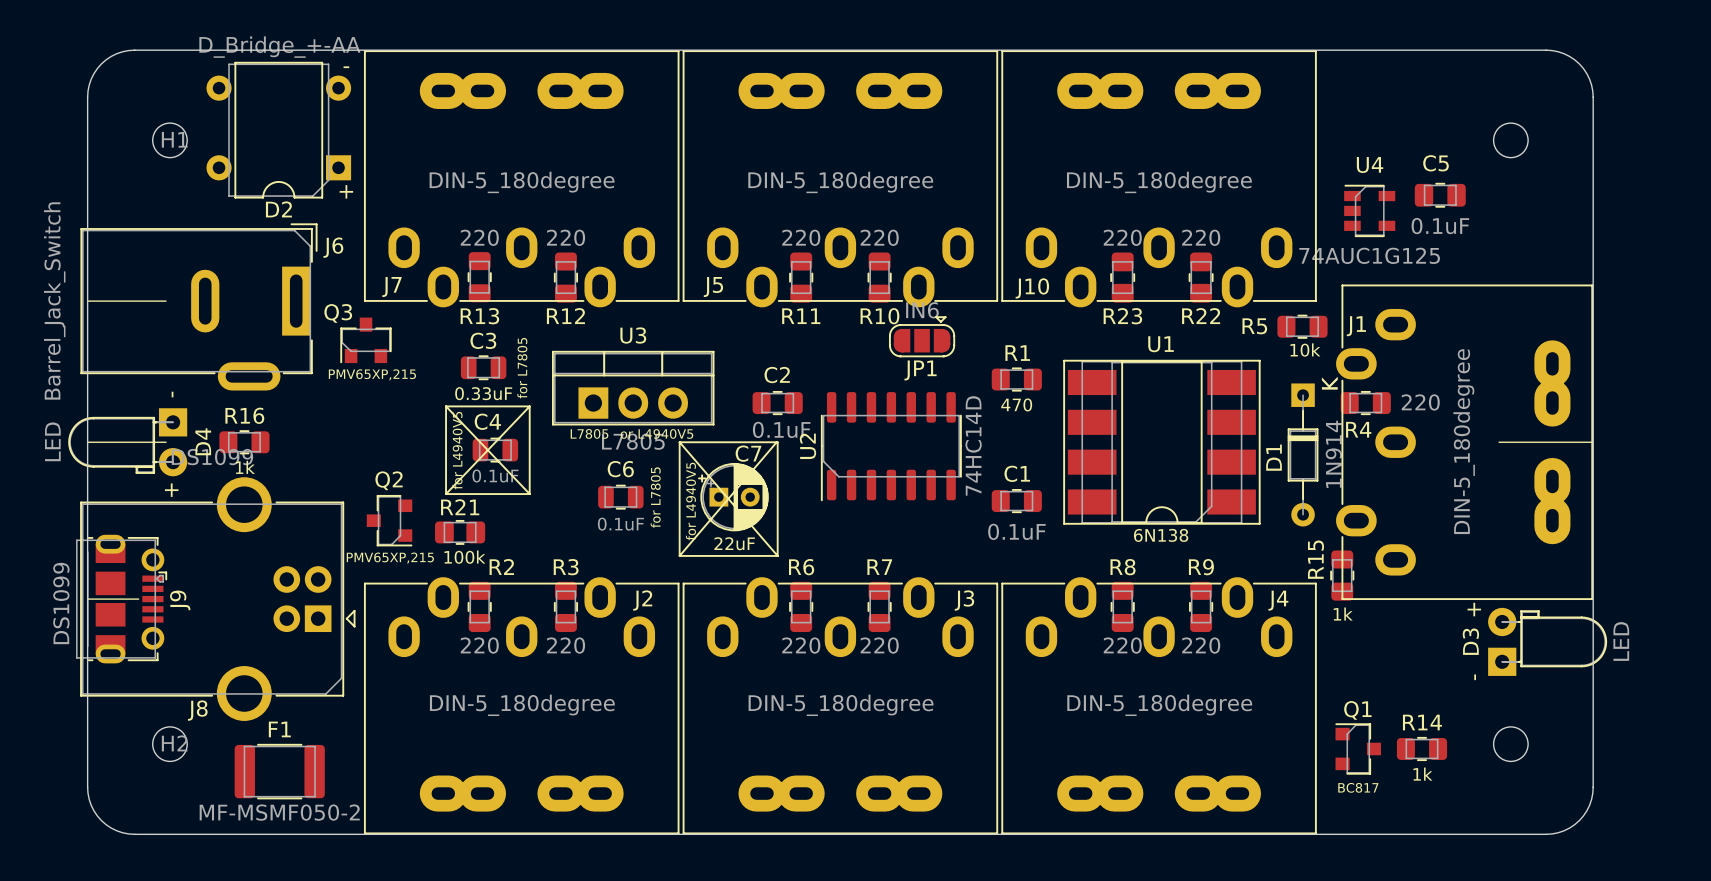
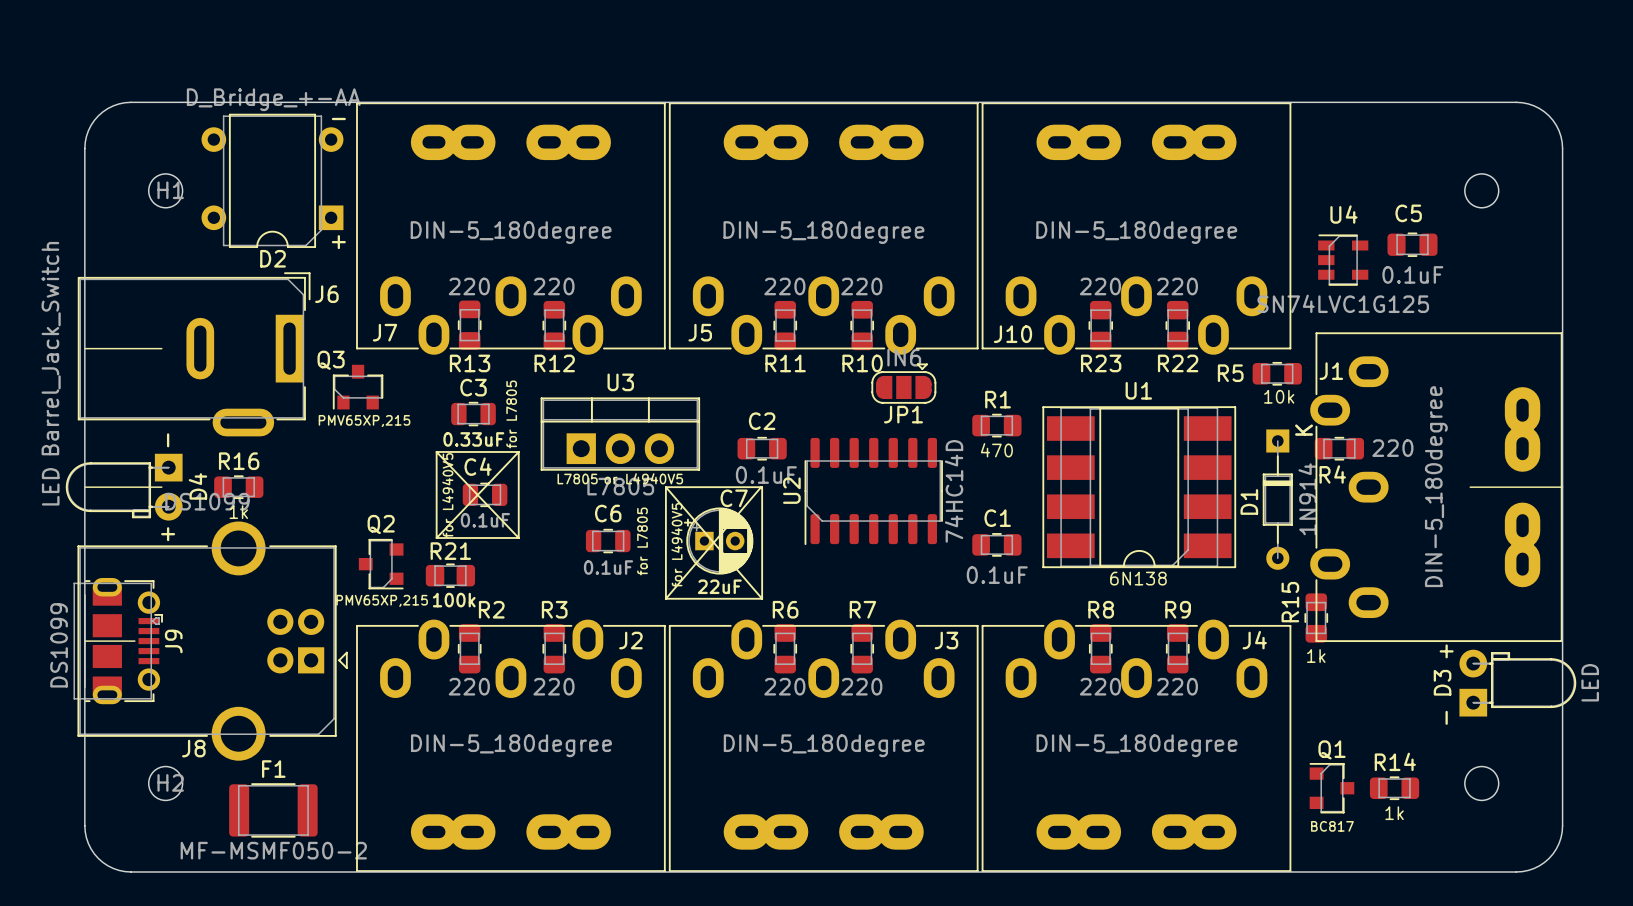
U4 value: 74AUC1G125 (1369, 255) -> SN74LVC1G125 (1343, 303)

